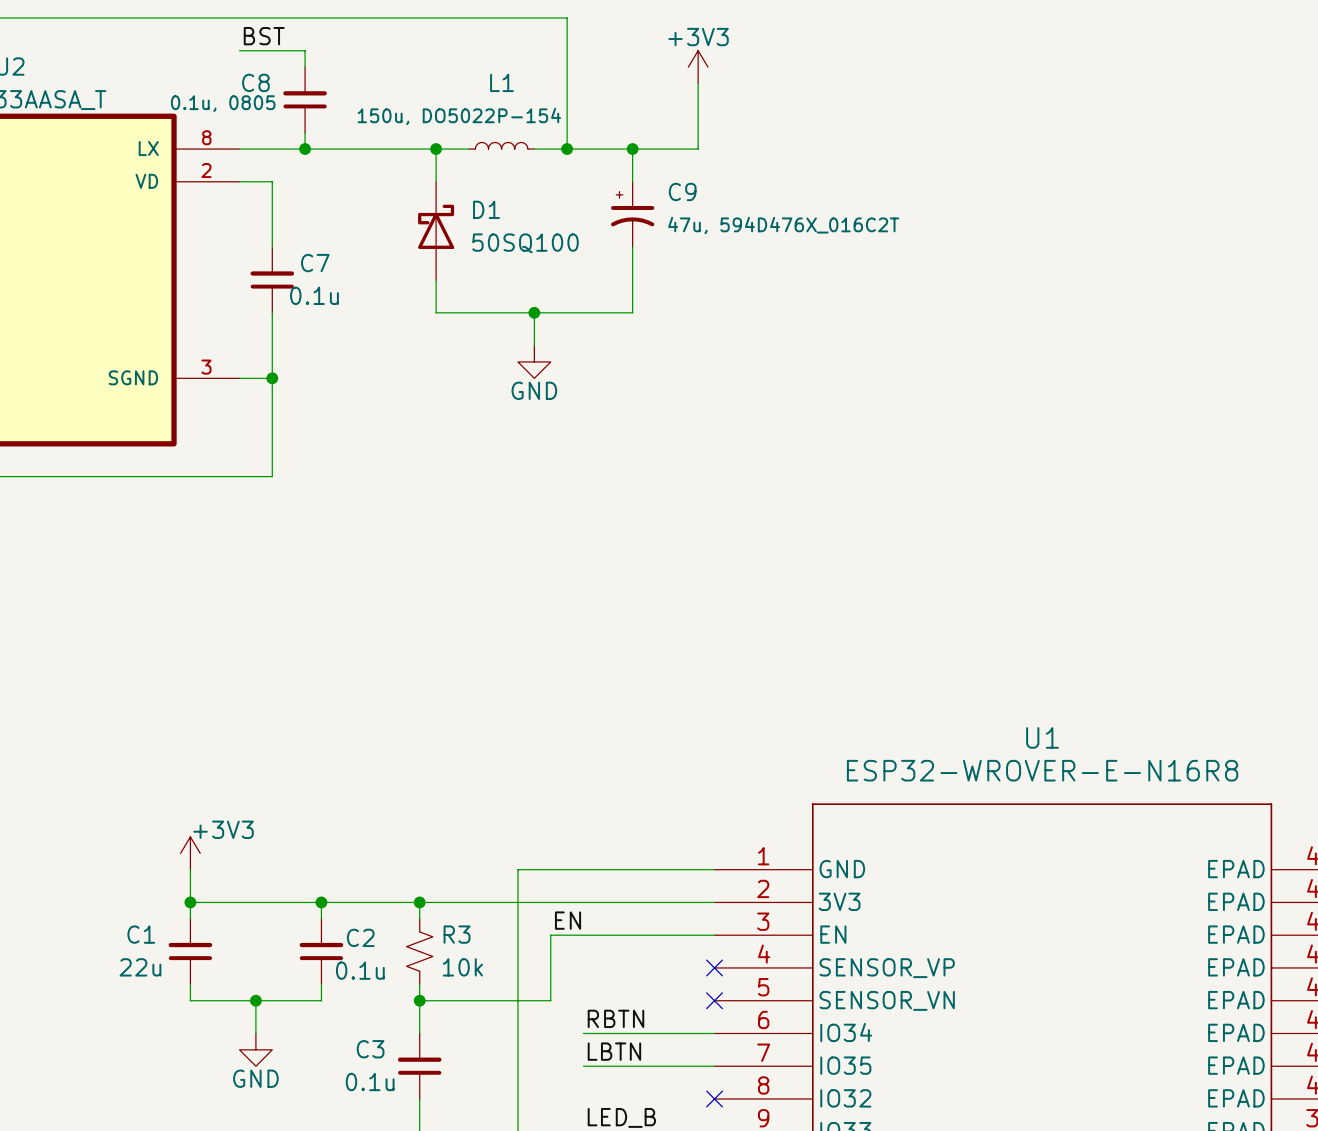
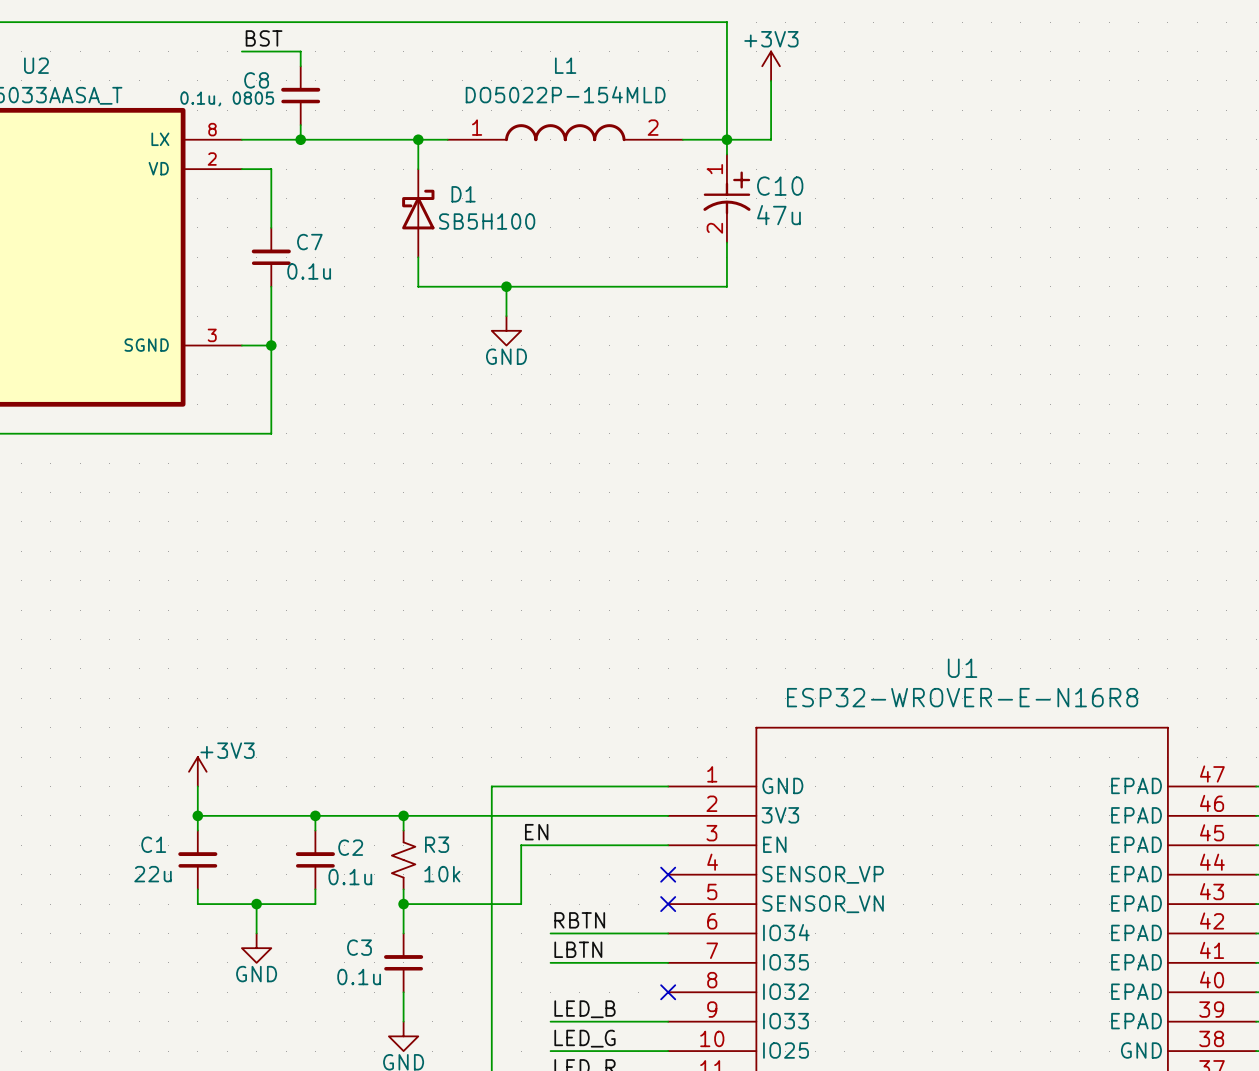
wire: (567, 18) (567, 149) -> (535, 22) (726, 22) (726, 154)
power symbol position: +3V3 (698, 67) -> +3V3 (771, 66)
wire: (698, 83) (698, 149) (534, 149) -> none
wire: none -> (771, 80) (771, 139) (682, 139)
L1 value: 150u, DO5022P-154 (459, 116) -> DO5022P-154MLD (565, 94)
L1 symbol: [468, 142, 535, 150] -> [447, 124, 683, 142]
junction: (567, 149) -> none
wire: (632, 149) (632, 181) -> none
junction: (632, 149) -> none
junction: none -> (726, 139)
C9: 47u, 594D476X_016C2T (632, 214) -> none
C10: none -> 47u (726, 198)
D1 value: 50SQ100 (525, 243) -> SB5H100 (487, 221)
wire: (632, 247) (632, 312) -> (726, 242) (726, 286) (594, 286)

